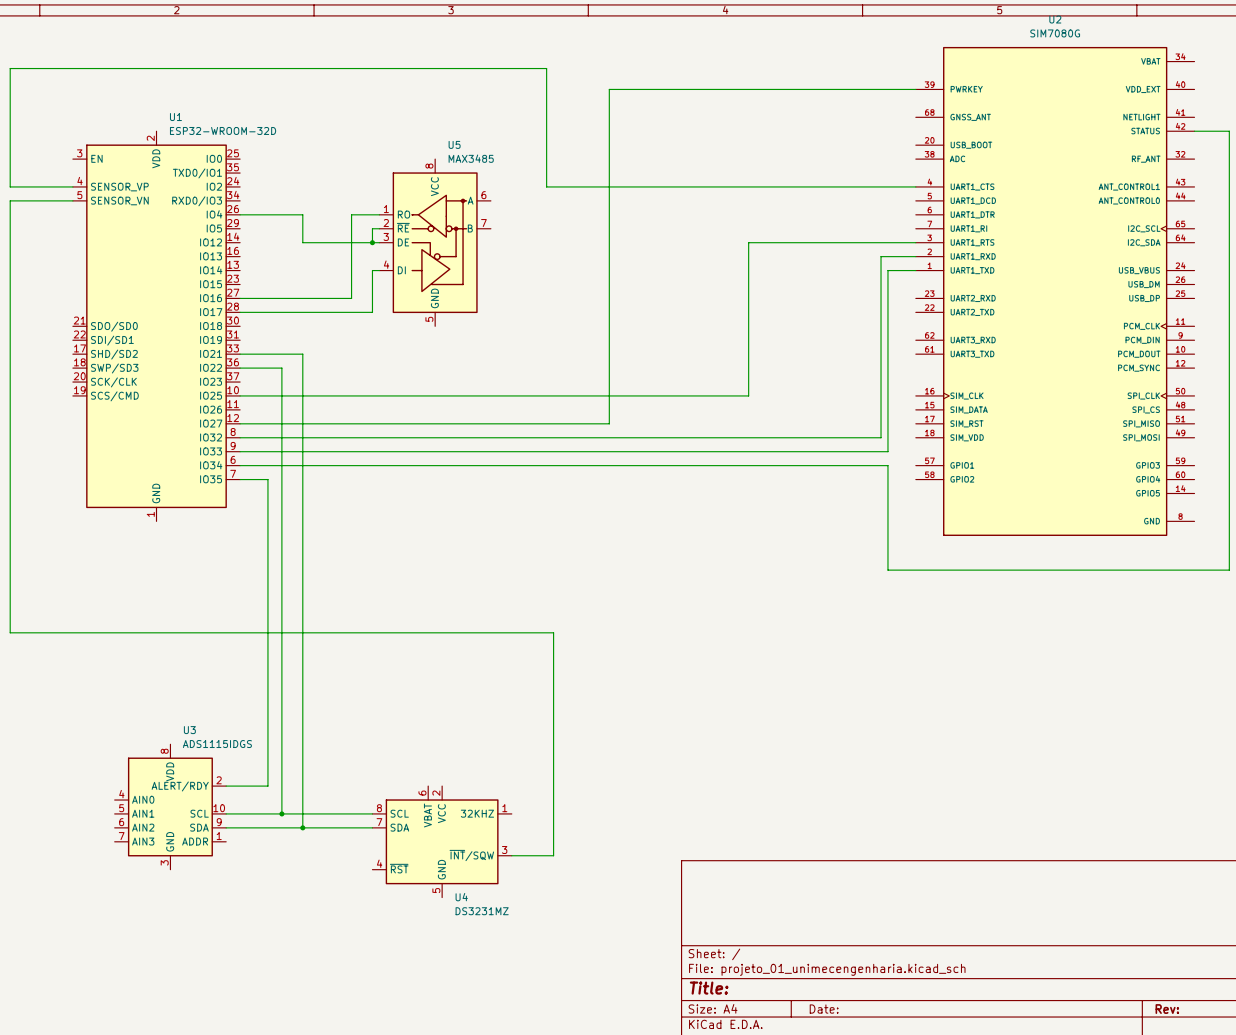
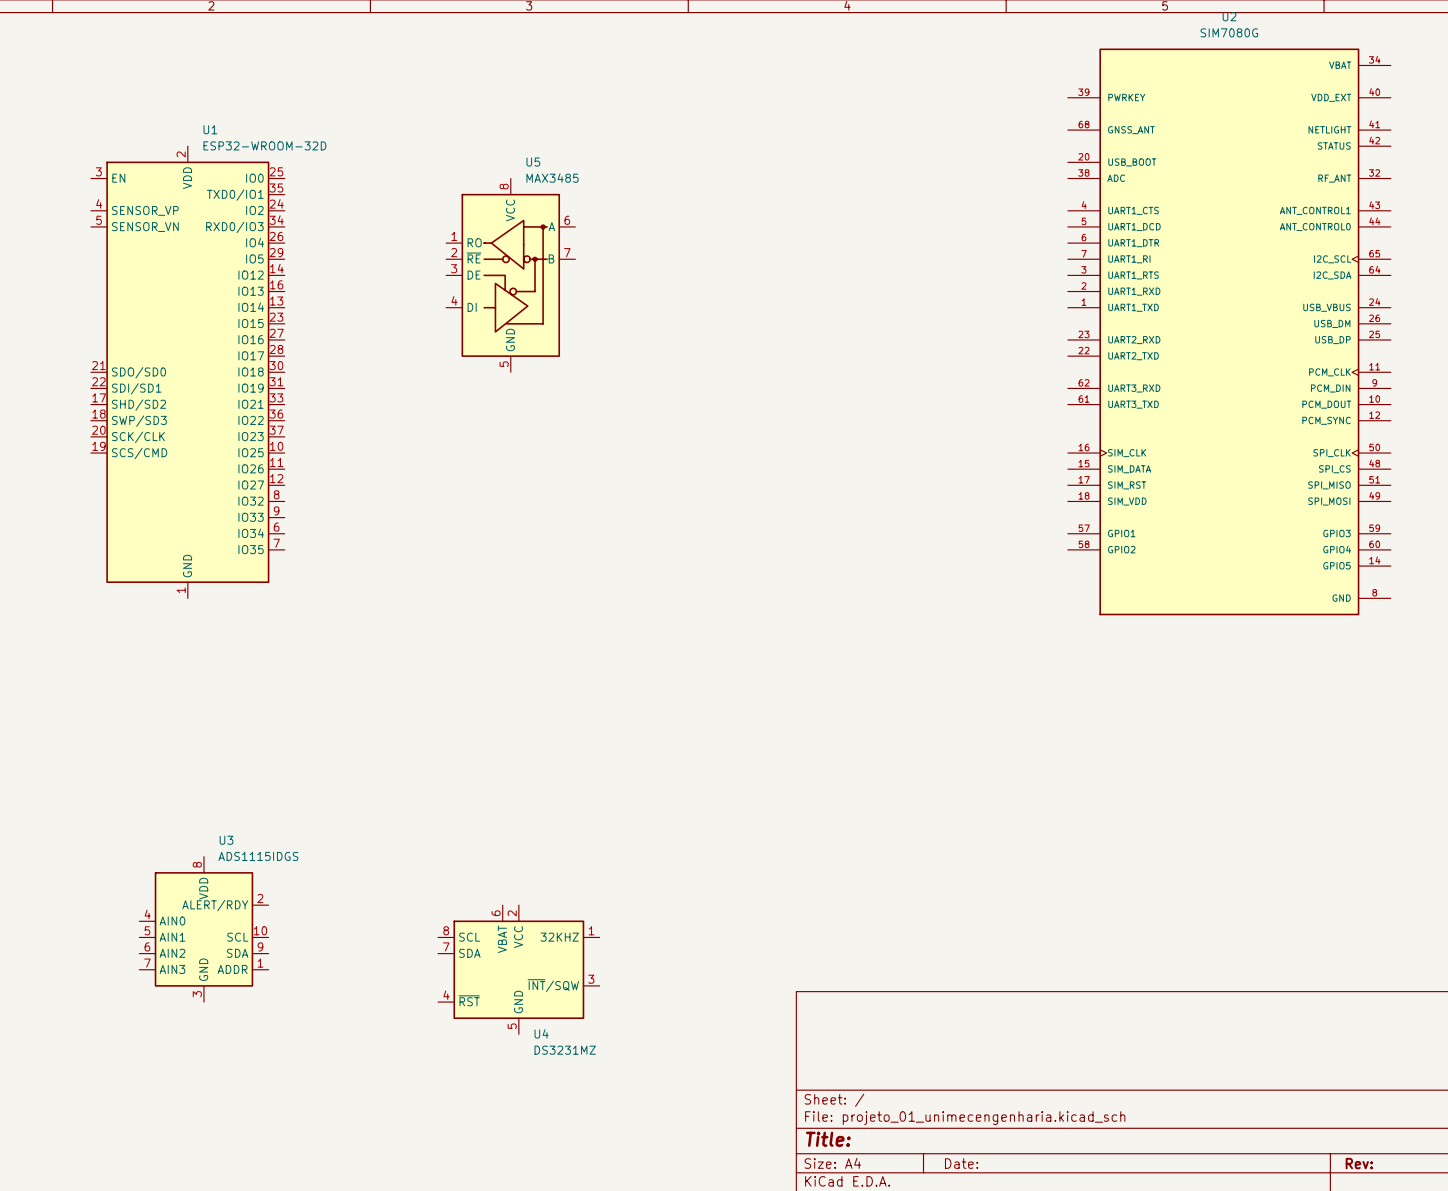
wire: (915, 89) (609, 89) (609, 423) (240, 423) -> none
wire: (1194, 131) (1229, 131) (1229, 570) (887, 570) (887, 465) (240, 465) -> none
wire: (72, 186) (10, 186) (10, 68) (546, 68) (546, 186) (915, 186) -> none
wire: (72, 200) (10, 200) (10, 632) (553, 632) (553, 855) (511, 855) -> none
wire: (240, 214) (302, 214) (302, 242) (379, 242) -> none
wire: (379, 214) (351, 214) (351, 298) (240, 298) -> none
wire: (379, 228) (372, 228) (372, 242) -> none
junction: (372, 242) -> none
wire: (915, 242) (748, 242) (748, 395) (240, 395) -> none
wire: (915, 256) (881, 256) (881, 437) (240, 437) -> none
wire: (379, 270) (372, 270) (372, 312) (240, 312) -> none
wire: (915, 270) (887, 270) (887, 451) (240, 451) -> none
wire: (240, 354) (302, 354) (302, 827) -> none
wire: (240, 368) (281, 368) (281, 813) -> none
wire: (240, 479) (267, 479) (267, 786) (226, 786) -> none
wire: (226, 813) (372, 813) -> none
junction: (281, 813) -> none
wire: (226, 827) (372, 827) -> none
junction: (302, 827) -> none

